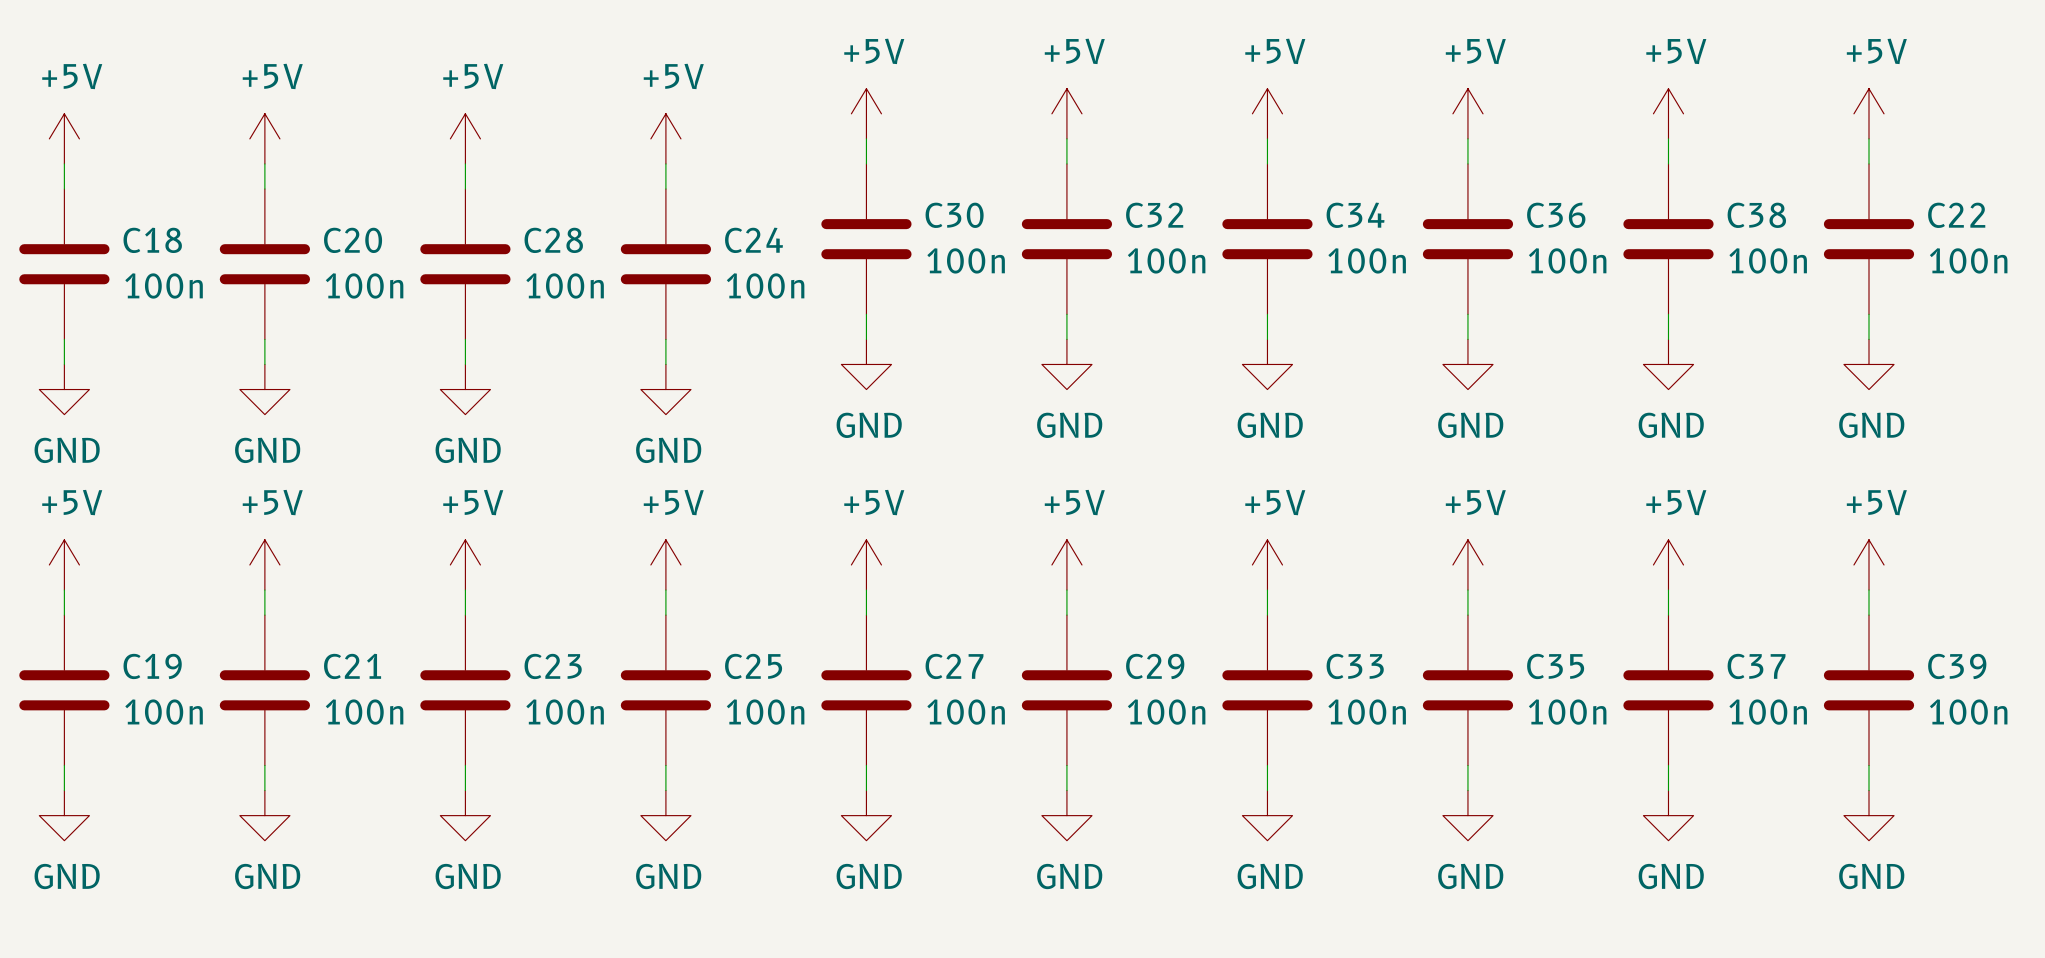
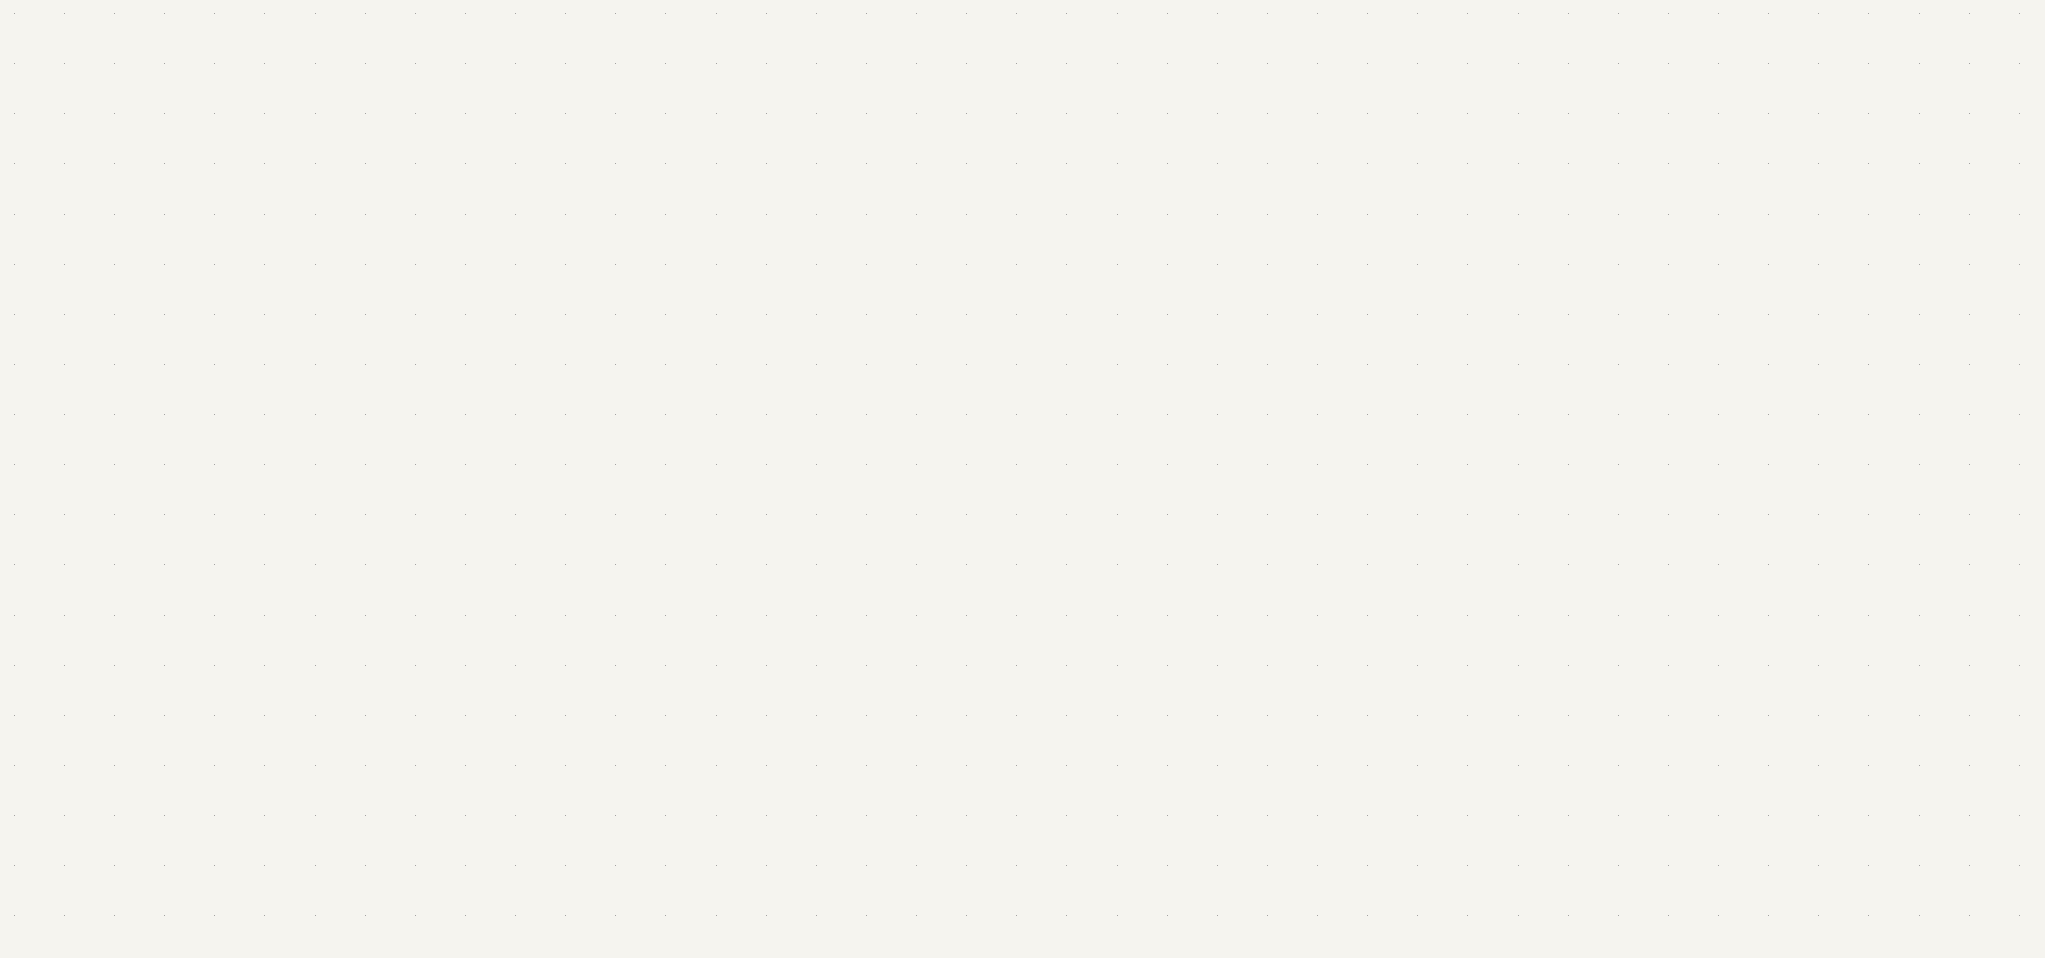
power symbol: +5V (866, 113) -> none
power symbol: +5V (1066, 113) -> none
power symbol: +5V (1267, 113) -> none
power symbol: +5V (1467, 113) -> none
power symbol: +5V (1668, 113) -> none
power symbol: +5V (1868, 113) -> none
power symbol: +5V (64, 138) -> none
power symbol: +5V (264, 138) -> none
power symbol: +5V (465, 138) -> none
power symbol: +5V (665, 138) -> none
wire: (866, 138) (866, 163) -> none
wire: (1066, 138) (1066, 163) -> none
wire: (1267, 138) (1267, 163) -> none
wire: (1467, 138) (1467, 163) -> none
wire: (1668, 138) (1668, 163) -> none
wire: (1868, 138) (1868, 163) -> none
wire: (64, 163) (64, 189) -> none
wire: (264, 163) (264, 189) -> none
wire: (465, 163) (465, 189) -> none
wire: (665, 163) (665, 189) -> none
C30: 100n (866, 239) -> none
C32: 100n (1066, 239) -> none
C34: 100n (1267, 239) -> none
C36: 100n (1467, 239) -> none
C38: 100n (1668, 239) -> none
C22: 100n (1868, 239) -> none
C18: 100n (64, 264) -> none
C20: 100n (264, 264) -> none
C28: 100n (465, 264) -> none
C24: 100n (665, 264) -> none
wire: (866, 314) (866, 339) -> none
wire: (1066, 314) (1066, 339) -> none
wire: (1267, 314) (1267, 339) -> none
wire: (1467, 314) (1467, 339) -> none
wire: (1668, 314) (1668, 339) -> none
wire: (1868, 314) (1868, 339) -> none
wire: (64, 339) (64, 364) -> none
wire: (264, 339) (264, 364) -> none
wire: (465, 339) (465, 364) -> none
wire: (665, 339) (665, 364) -> none
power symbol: GND (866, 364) -> none
power symbol: GND (1066, 364) -> none
power symbol: GND (1267, 364) -> none
power symbol: GND (1467, 364) -> none
power symbol: GND (1668, 364) -> none
power symbol: GND (1868, 364) -> none
power symbol: GND (64, 389) -> none
power symbol: GND (264, 389) -> none
power symbol: GND (465, 389) -> none
power symbol: GND (665, 389) -> none
power symbol: +5V (64, 564) -> none
power symbol: +5V (264, 564) -> none
power symbol: +5V (465, 564) -> none
power symbol: +5V (665, 564) -> none
power symbol: +5V (866, 564) -> none
power symbol: +5V (1066, 564) -> none
power symbol: +5V (1267, 564) -> none
power symbol: +5V (1467, 564) -> none
power symbol: +5V (1668, 564) -> none
power symbol: +5V (1868, 564) -> none
wire: (64, 590) (64, 615) -> none
wire: (264, 590) (264, 615) -> none
wire: (465, 590) (465, 615) -> none
wire: (665, 590) (665, 615) -> none
wire: (866, 590) (866, 615) -> none
wire: (1066, 590) (1066, 615) -> none
wire: (1267, 590) (1267, 615) -> none
wire: (1467, 590) (1467, 615) -> none
wire: (1668, 590) (1668, 615) -> none
wire: (1868, 590) (1868, 615) -> none
C19: 100n (64, 690) -> none
C21: 100n (264, 690) -> none
C23: 100n (465, 690) -> none
C25: 100n (665, 690) -> none
C27: 100n (866, 690) -> none
C29: 100n (1066, 690) -> none
C33: 100n (1267, 690) -> none
C35: 100n (1467, 690) -> none
C37: 100n (1668, 690) -> none
C39: 100n (1868, 690) -> none
wire: (64, 765) (64, 790) -> none
wire: (264, 765) (264, 790) -> none
wire: (465, 765) (465, 790) -> none
wire: (665, 765) (665, 790) -> none
wire: (866, 765) (866, 790) -> none
wire: (1066, 765) (1066, 790) -> none
wire: (1267, 765) (1267, 790) -> none
wire: (1467, 765) (1467, 790) -> none
wire: (1668, 765) (1668, 790) -> none
wire: (1868, 765) (1868, 790) -> none
power symbol: GND (64, 815) -> none
power symbol: GND (264, 815) -> none
power symbol: GND (465, 815) -> none
power symbol: GND (665, 815) -> none
power symbol: GND (866, 815) -> none
power symbol: GND (1066, 815) -> none
power symbol: GND (1267, 815) -> none
power symbol: GND (1467, 815) -> none
power symbol: GND (1668, 815) -> none
power symbol: GND (1868, 815) -> none

